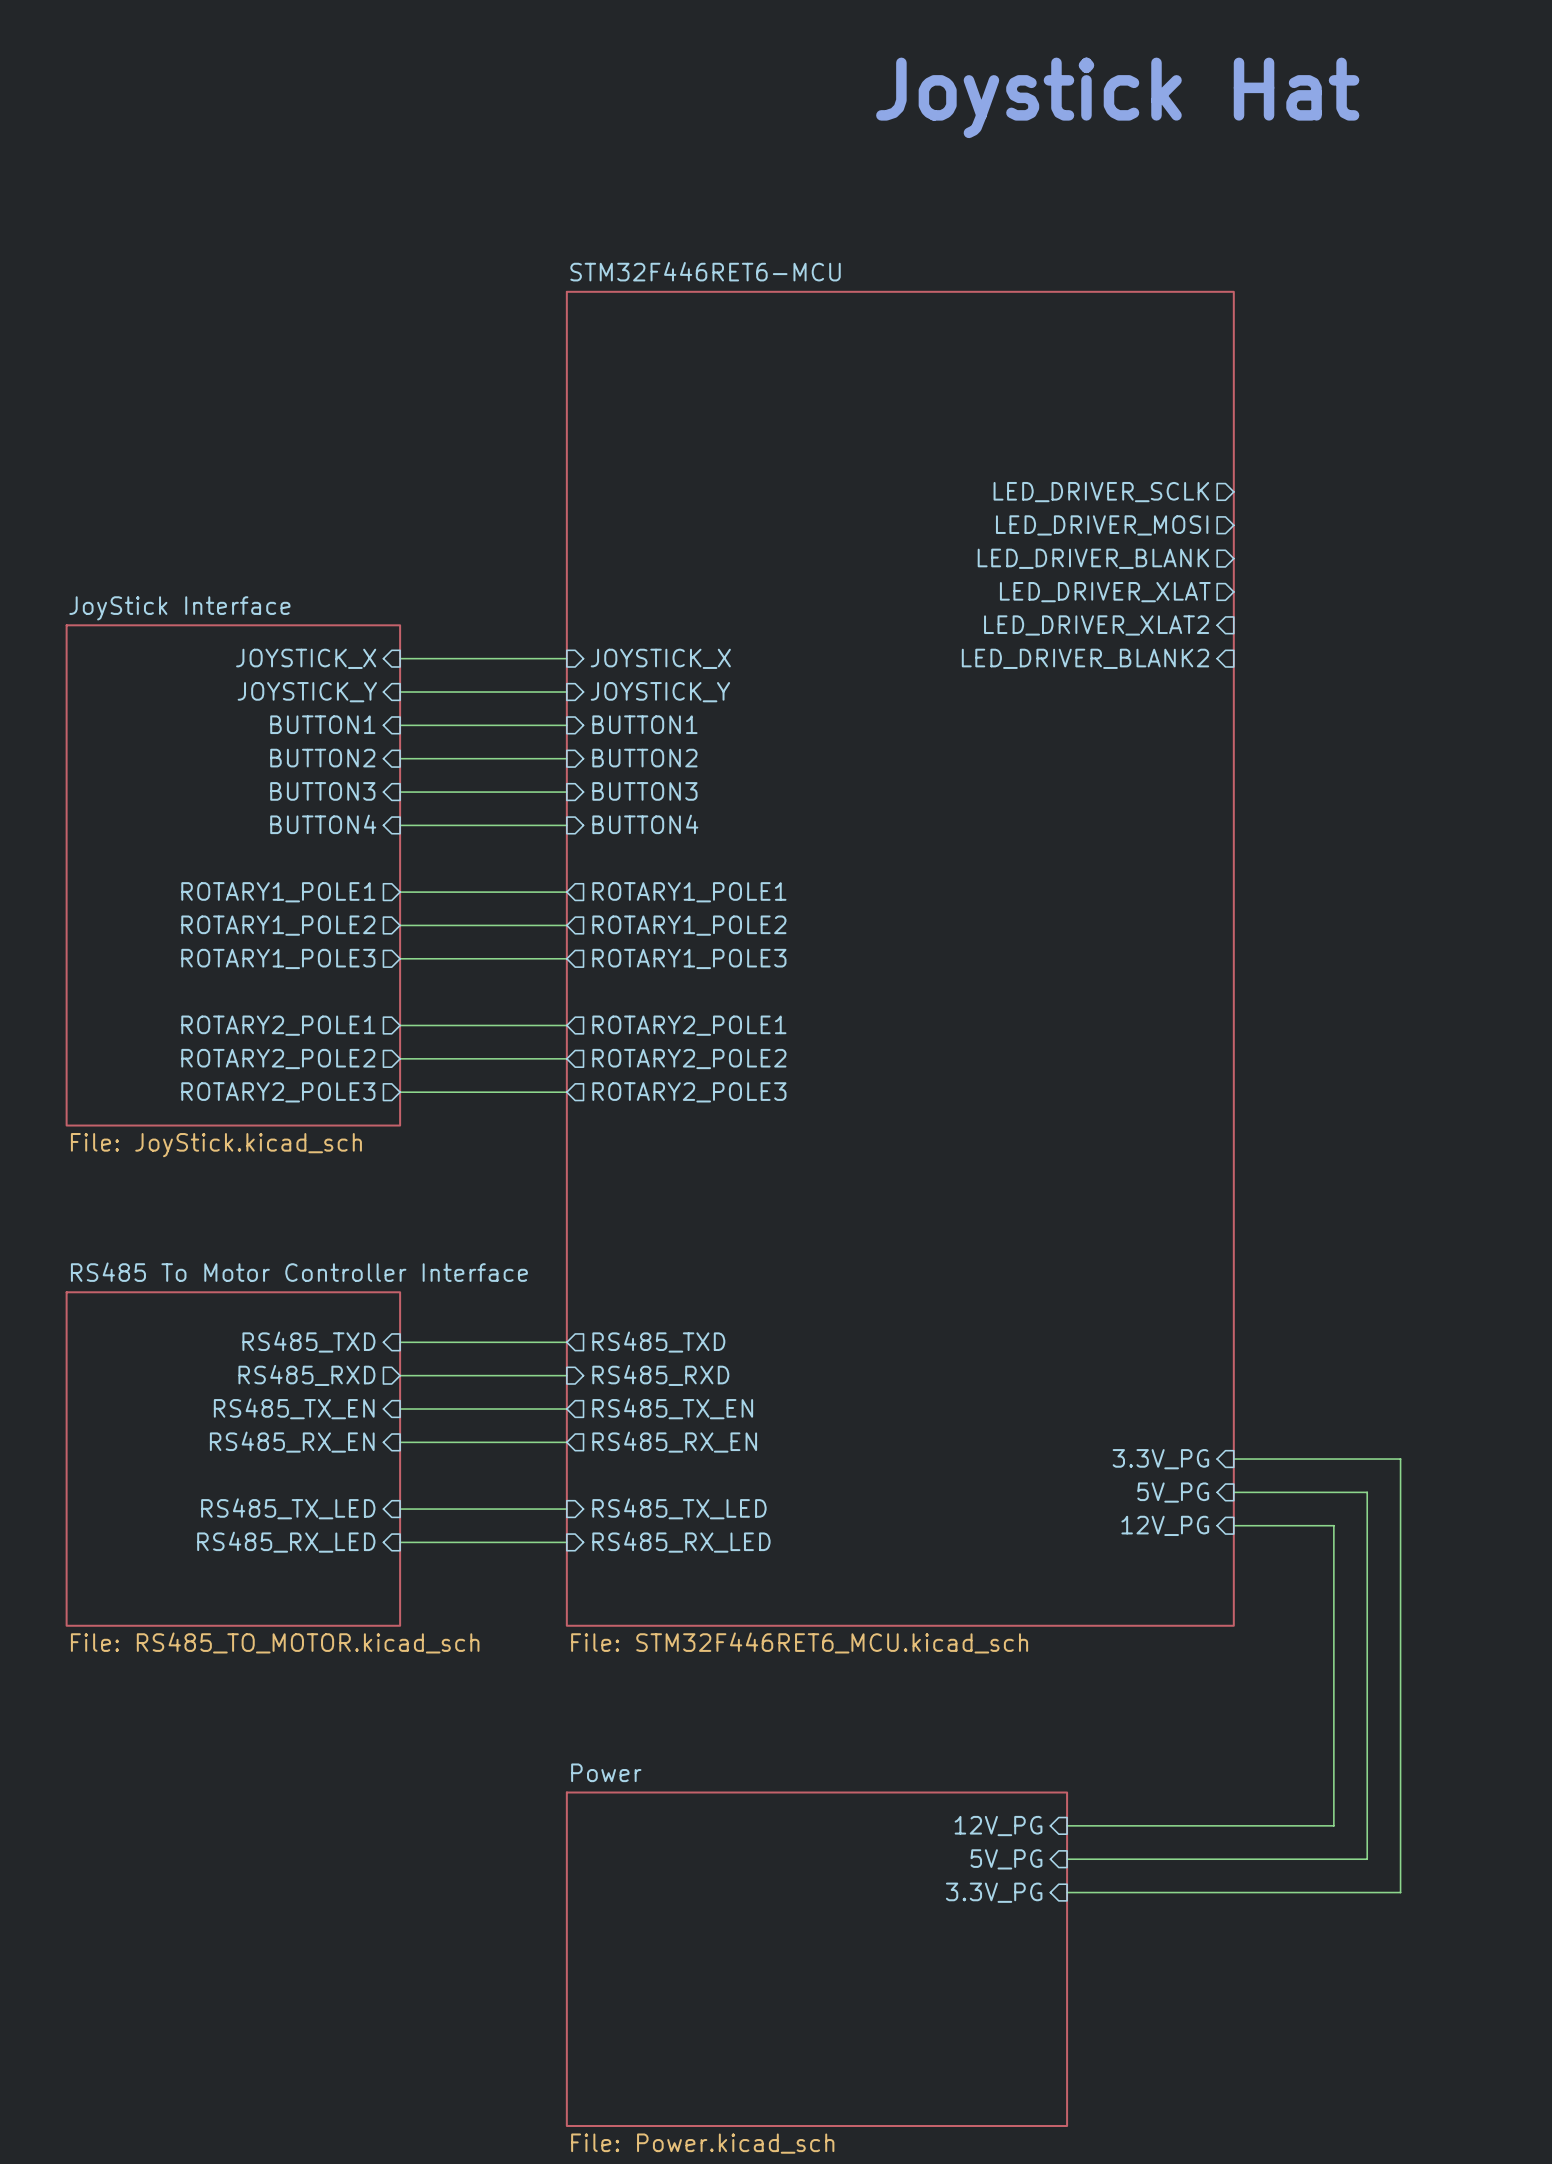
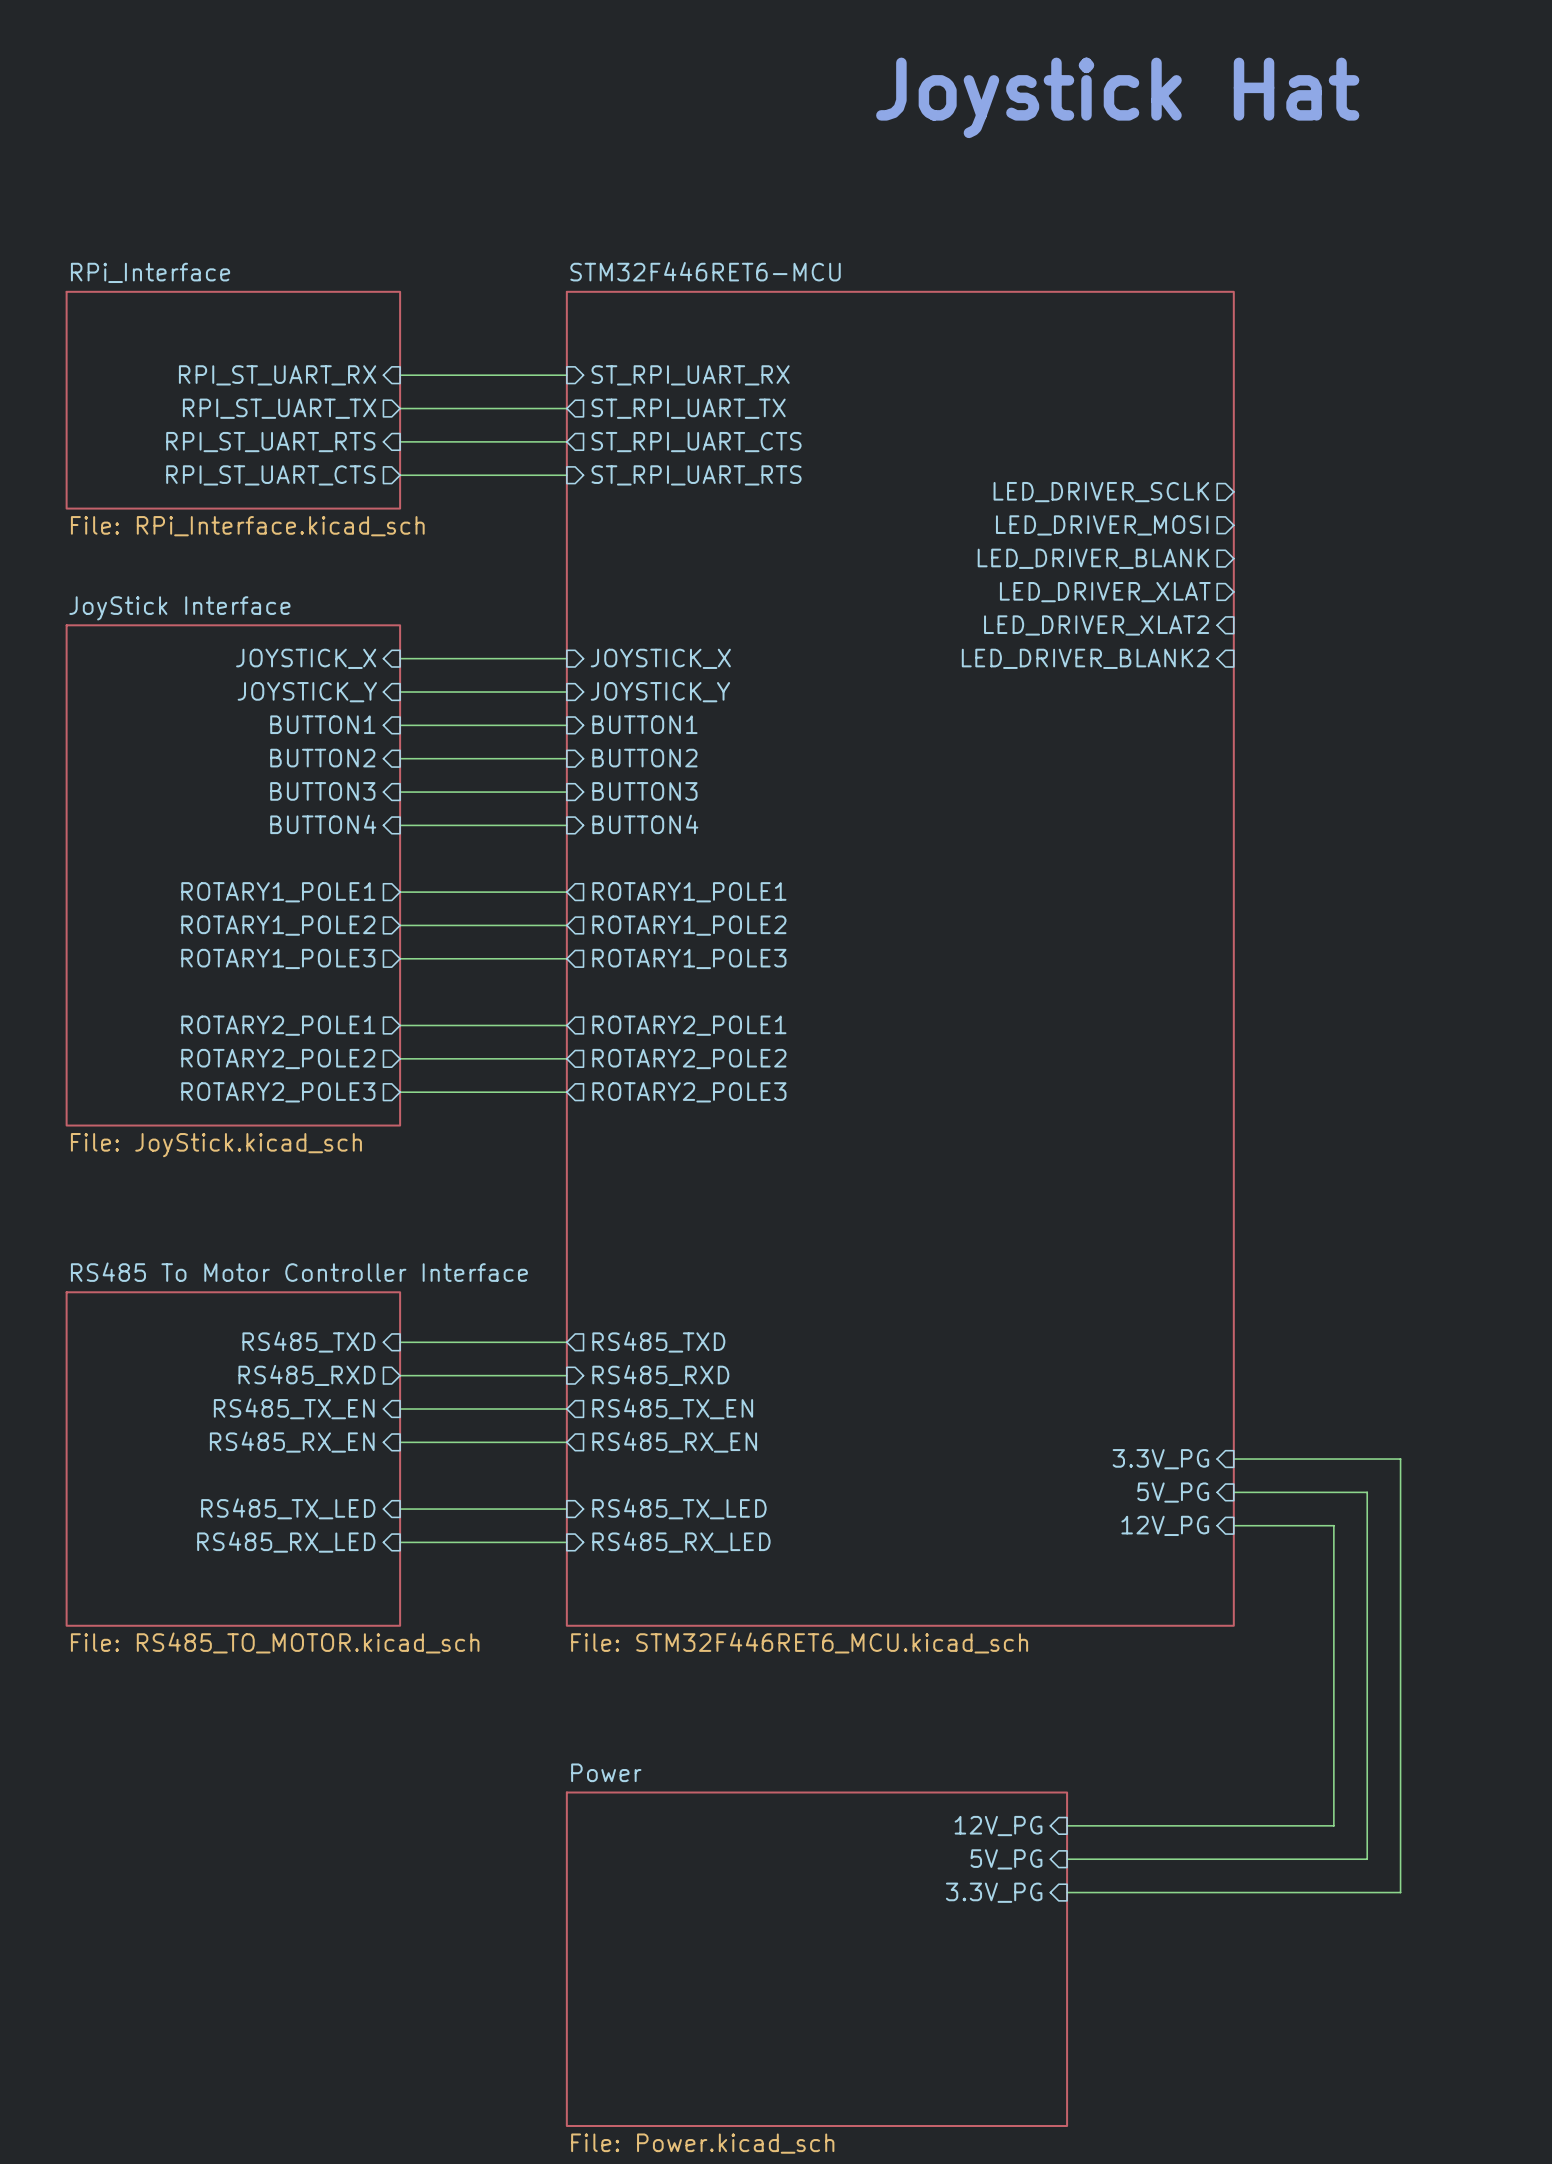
sheet pin: none -> RPI_ST_UART_RX (277, 375)
wire: none -> (400, 375) (566, 375)
sheet pin: none -> ST_RPI_UART_RX (690, 375)
sheet RPi_Interface: none -> File: RPi_Interface.kicad_sch (233, 400)
sheet pin: none -> RPI_ST_UART_TX (279, 408)
wire: none -> (400, 408) (566, 408)
sheet pin: none -> ST_RPI_UART_TX (688, 408)
wire: none -> (400, 441) (566, 441)
sheet pin: none -> RPI_ST_UART_RTS (270, 442)
sheet pin: none -> ST_RPI_UART_CTS (696, 442)
sheet pin: none -> RPI_ST_UART_CTS (270, 475)
wire: none -> (400, 475) (566, 475)
sheet pin: none -> ST_RPI_UART_RTS (696, 475)

